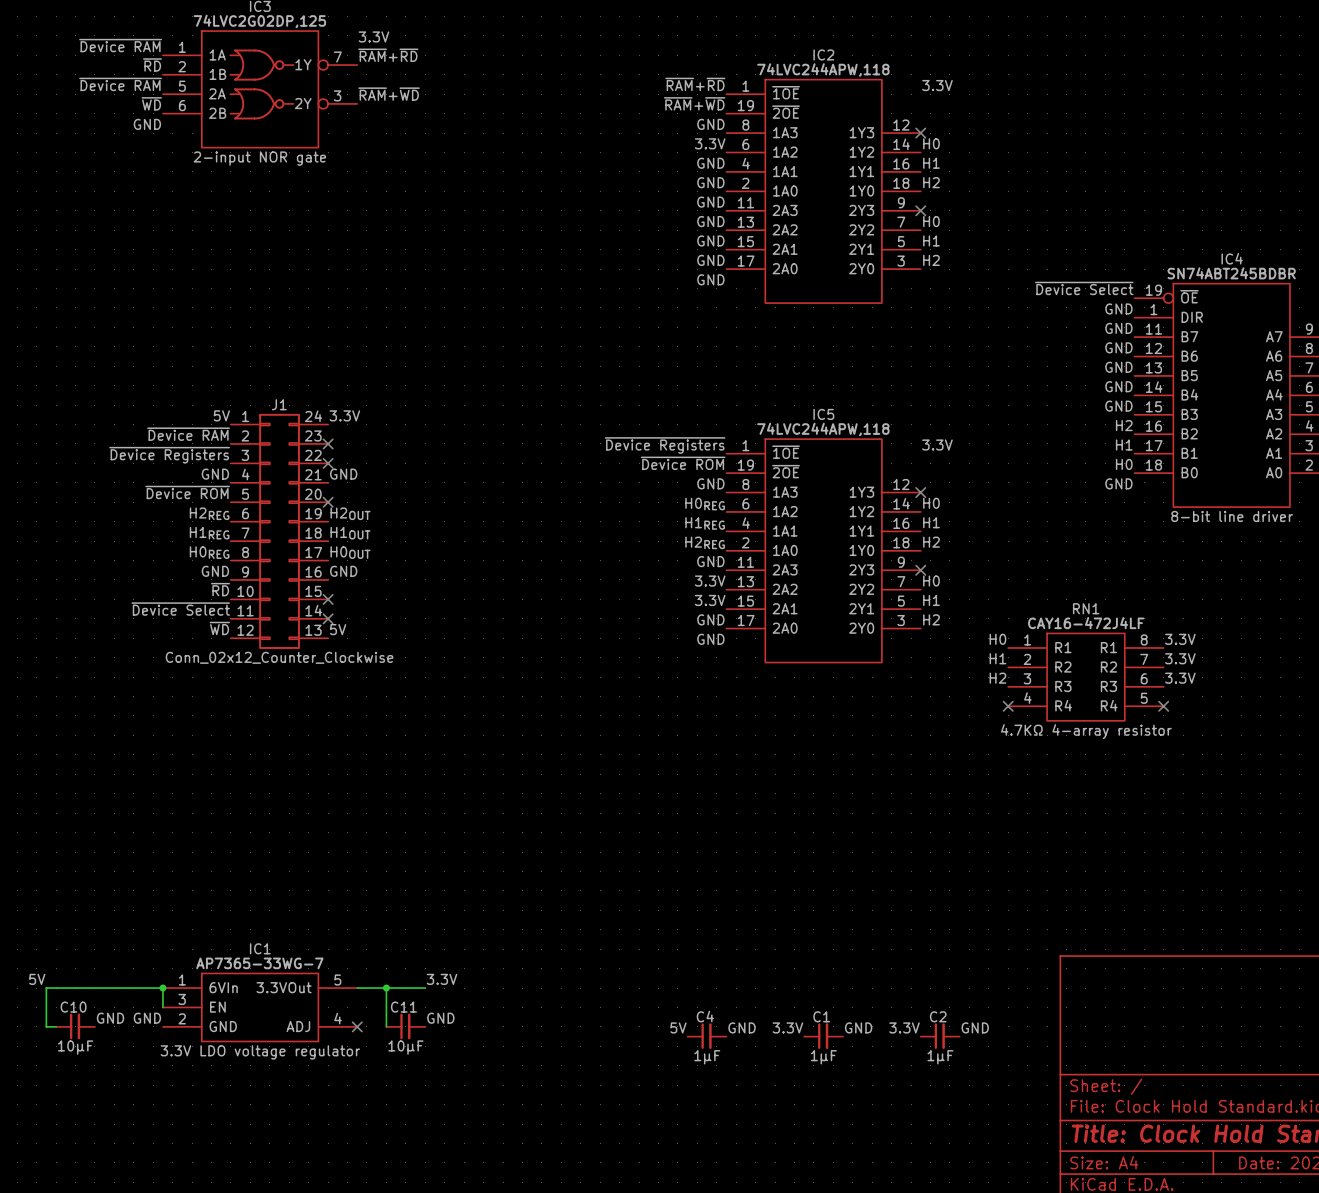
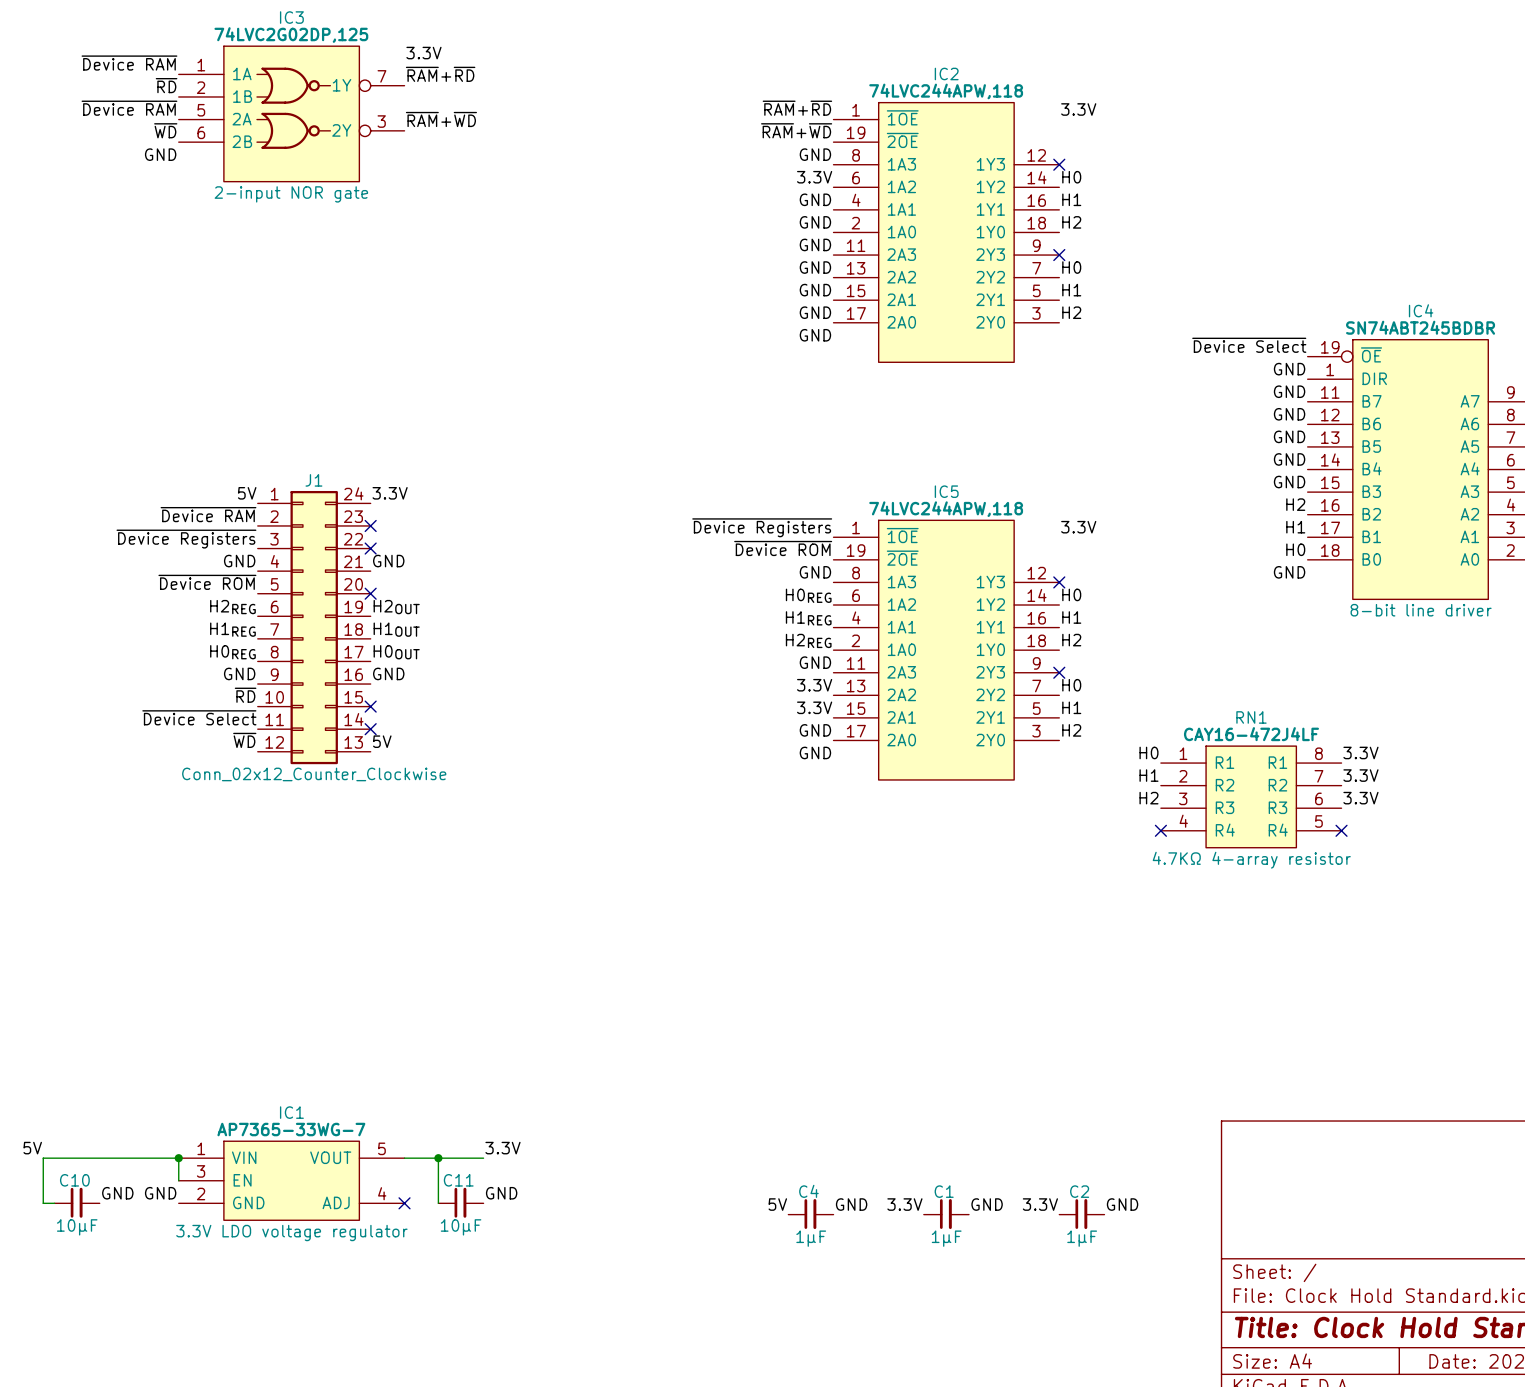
IC1 pin name: 6VIn (223, 987) -> VIN (244, 1157)
IC1 pin name: 3.3VOut (284, 987) -> VOUT (330, 1157)

